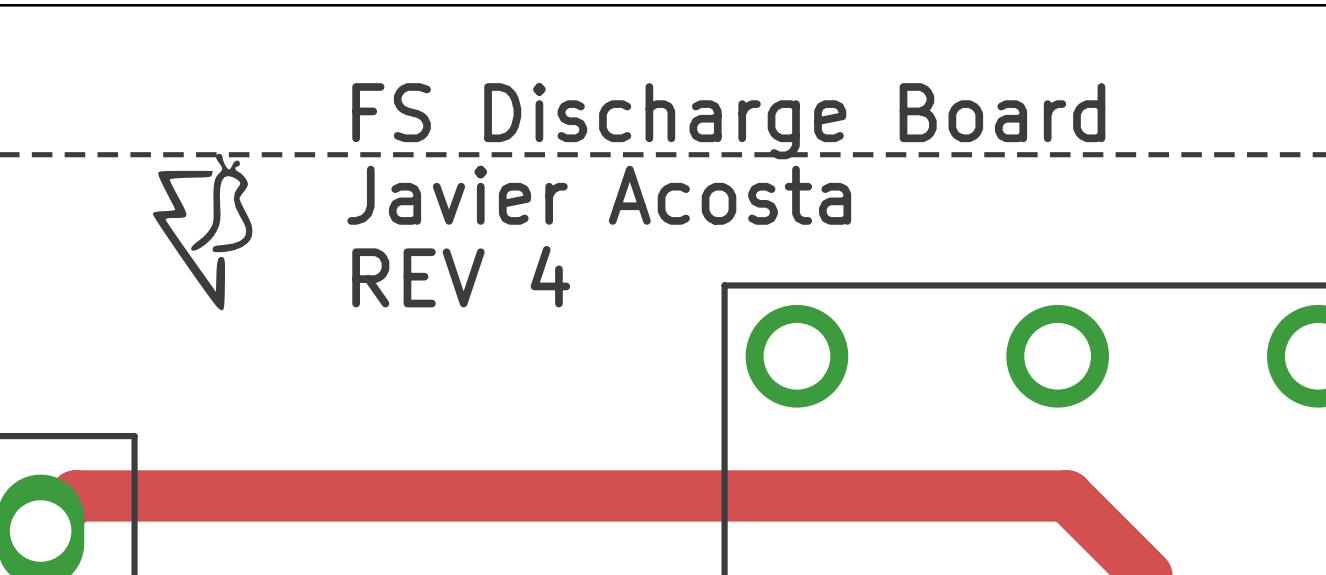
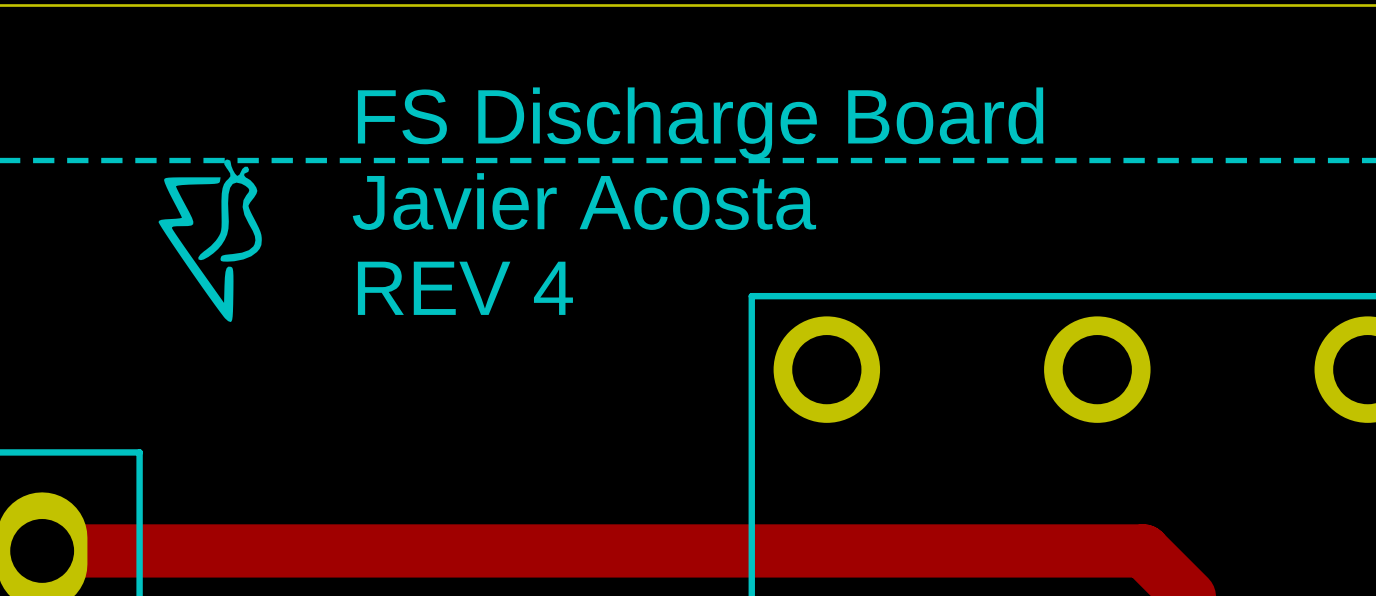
top track: (40, 531) (75, 495) (1066, 495) (1102, 531) -> (42, 550) (1143, 550)

